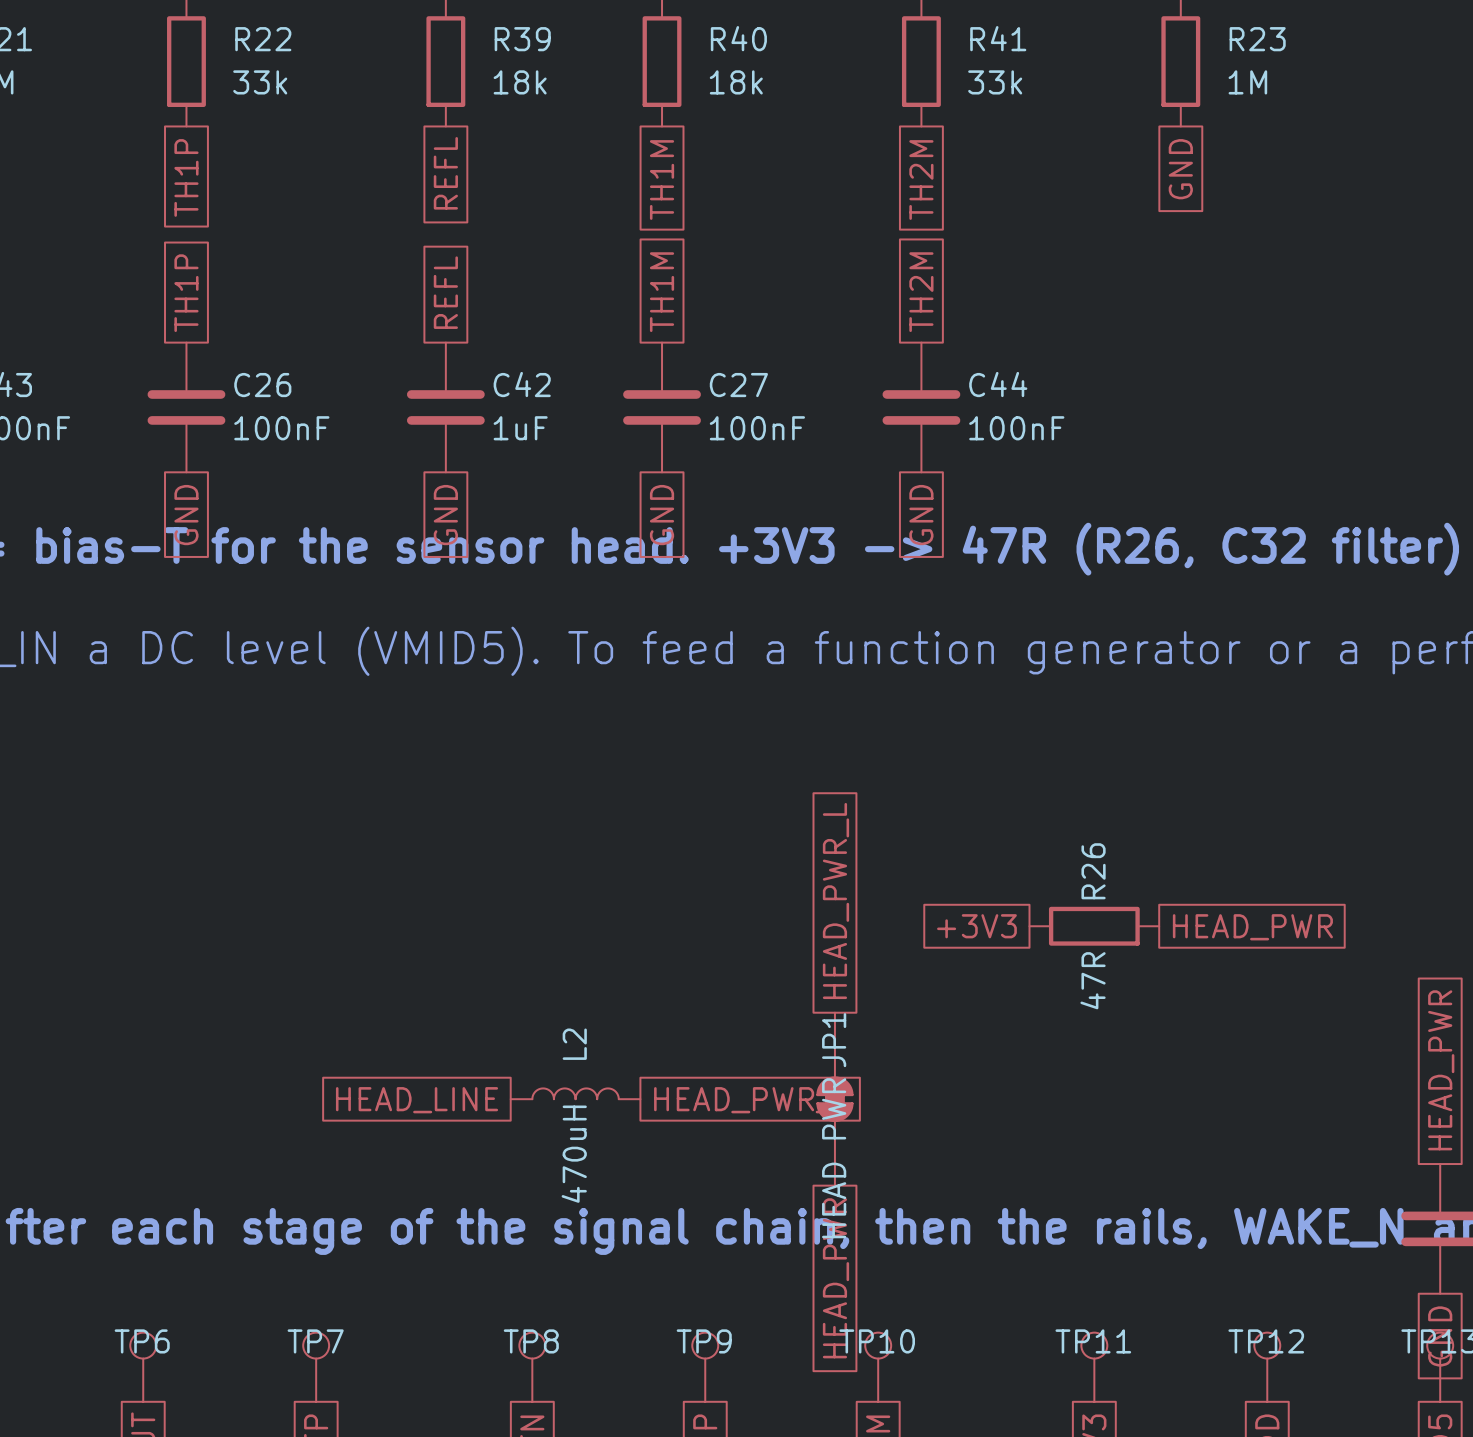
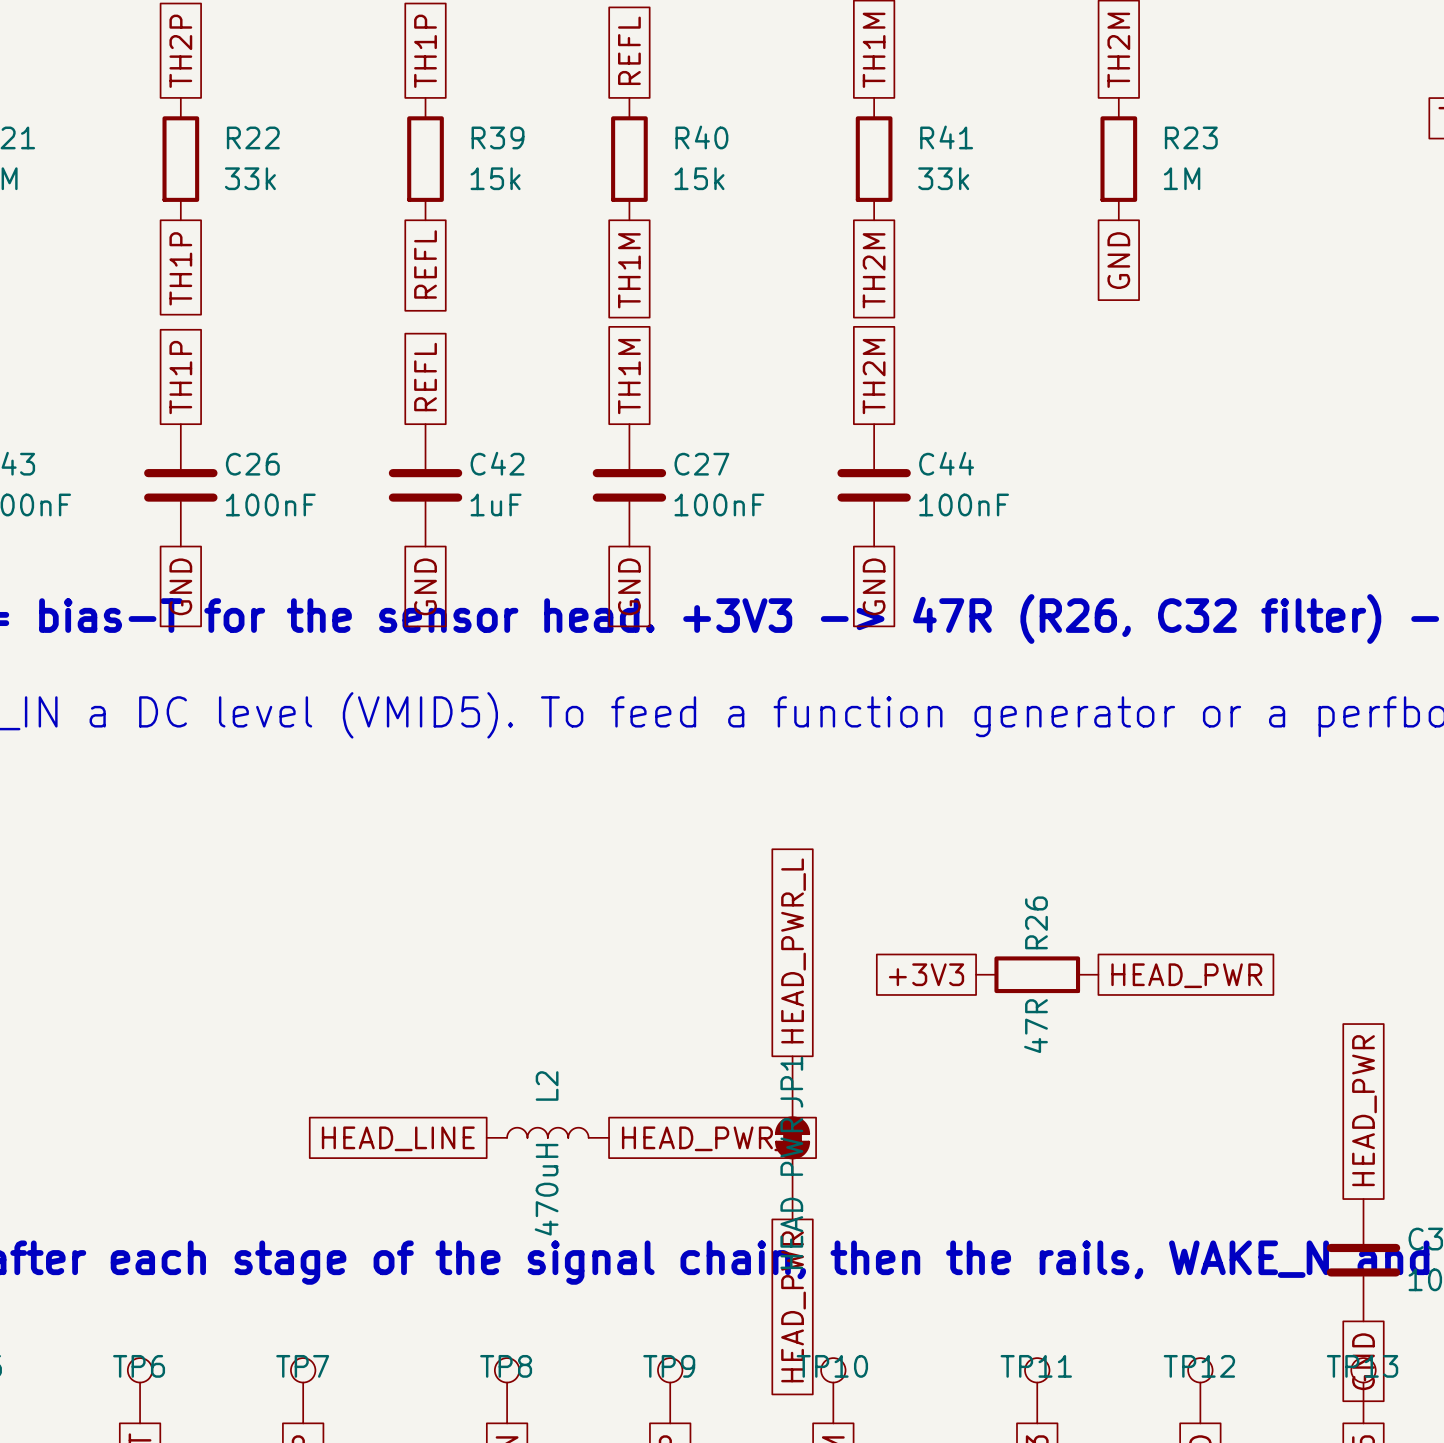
R39 value: 18k (520, 82) -> 15k (495, 178)
R40 value: 18k (736, 82) -> 15k (699, 178)

